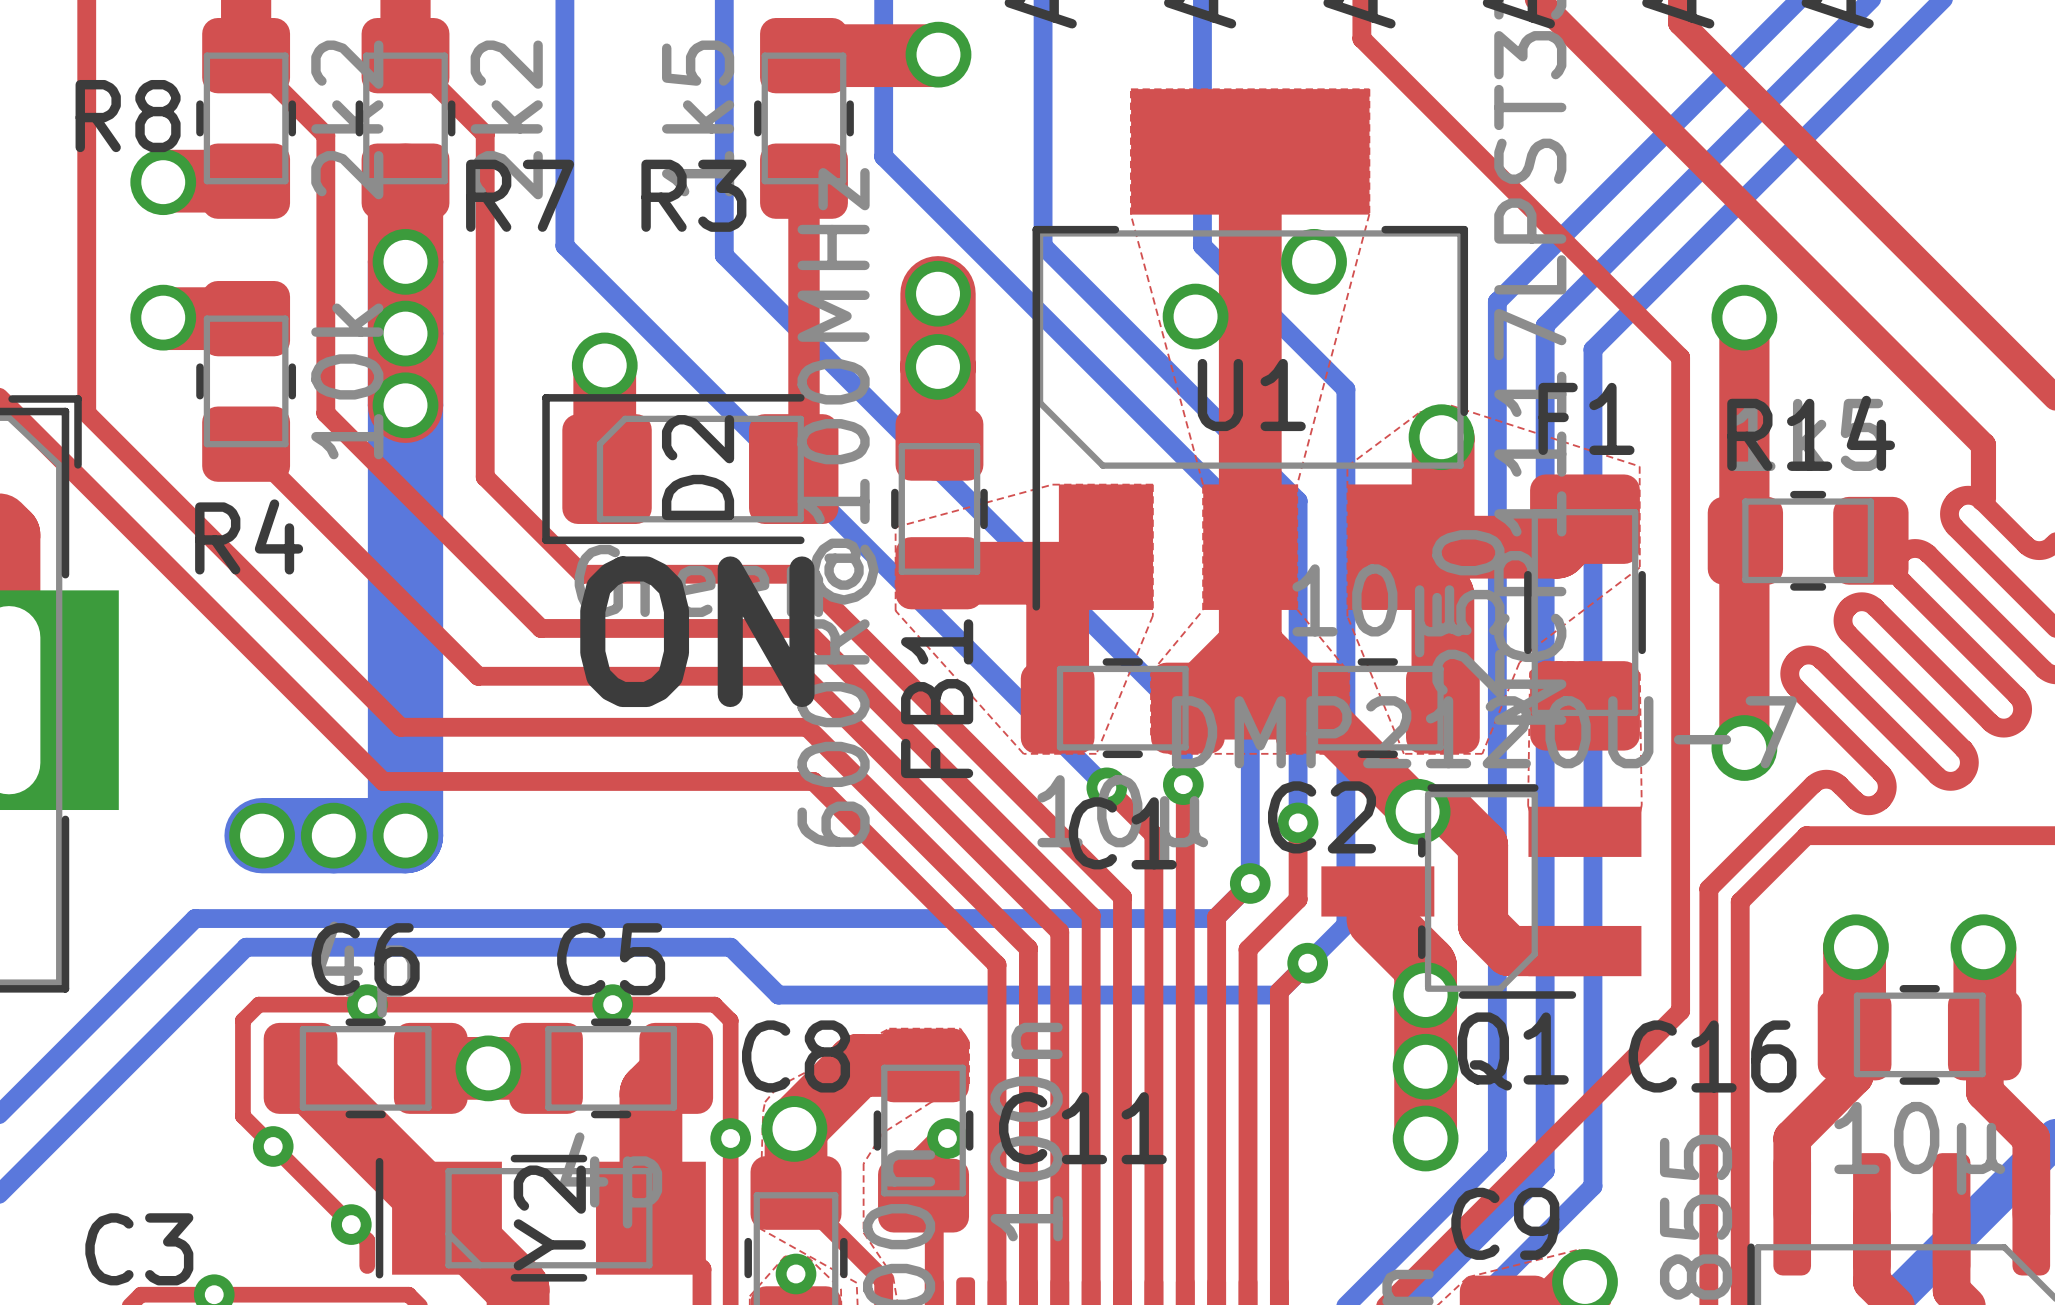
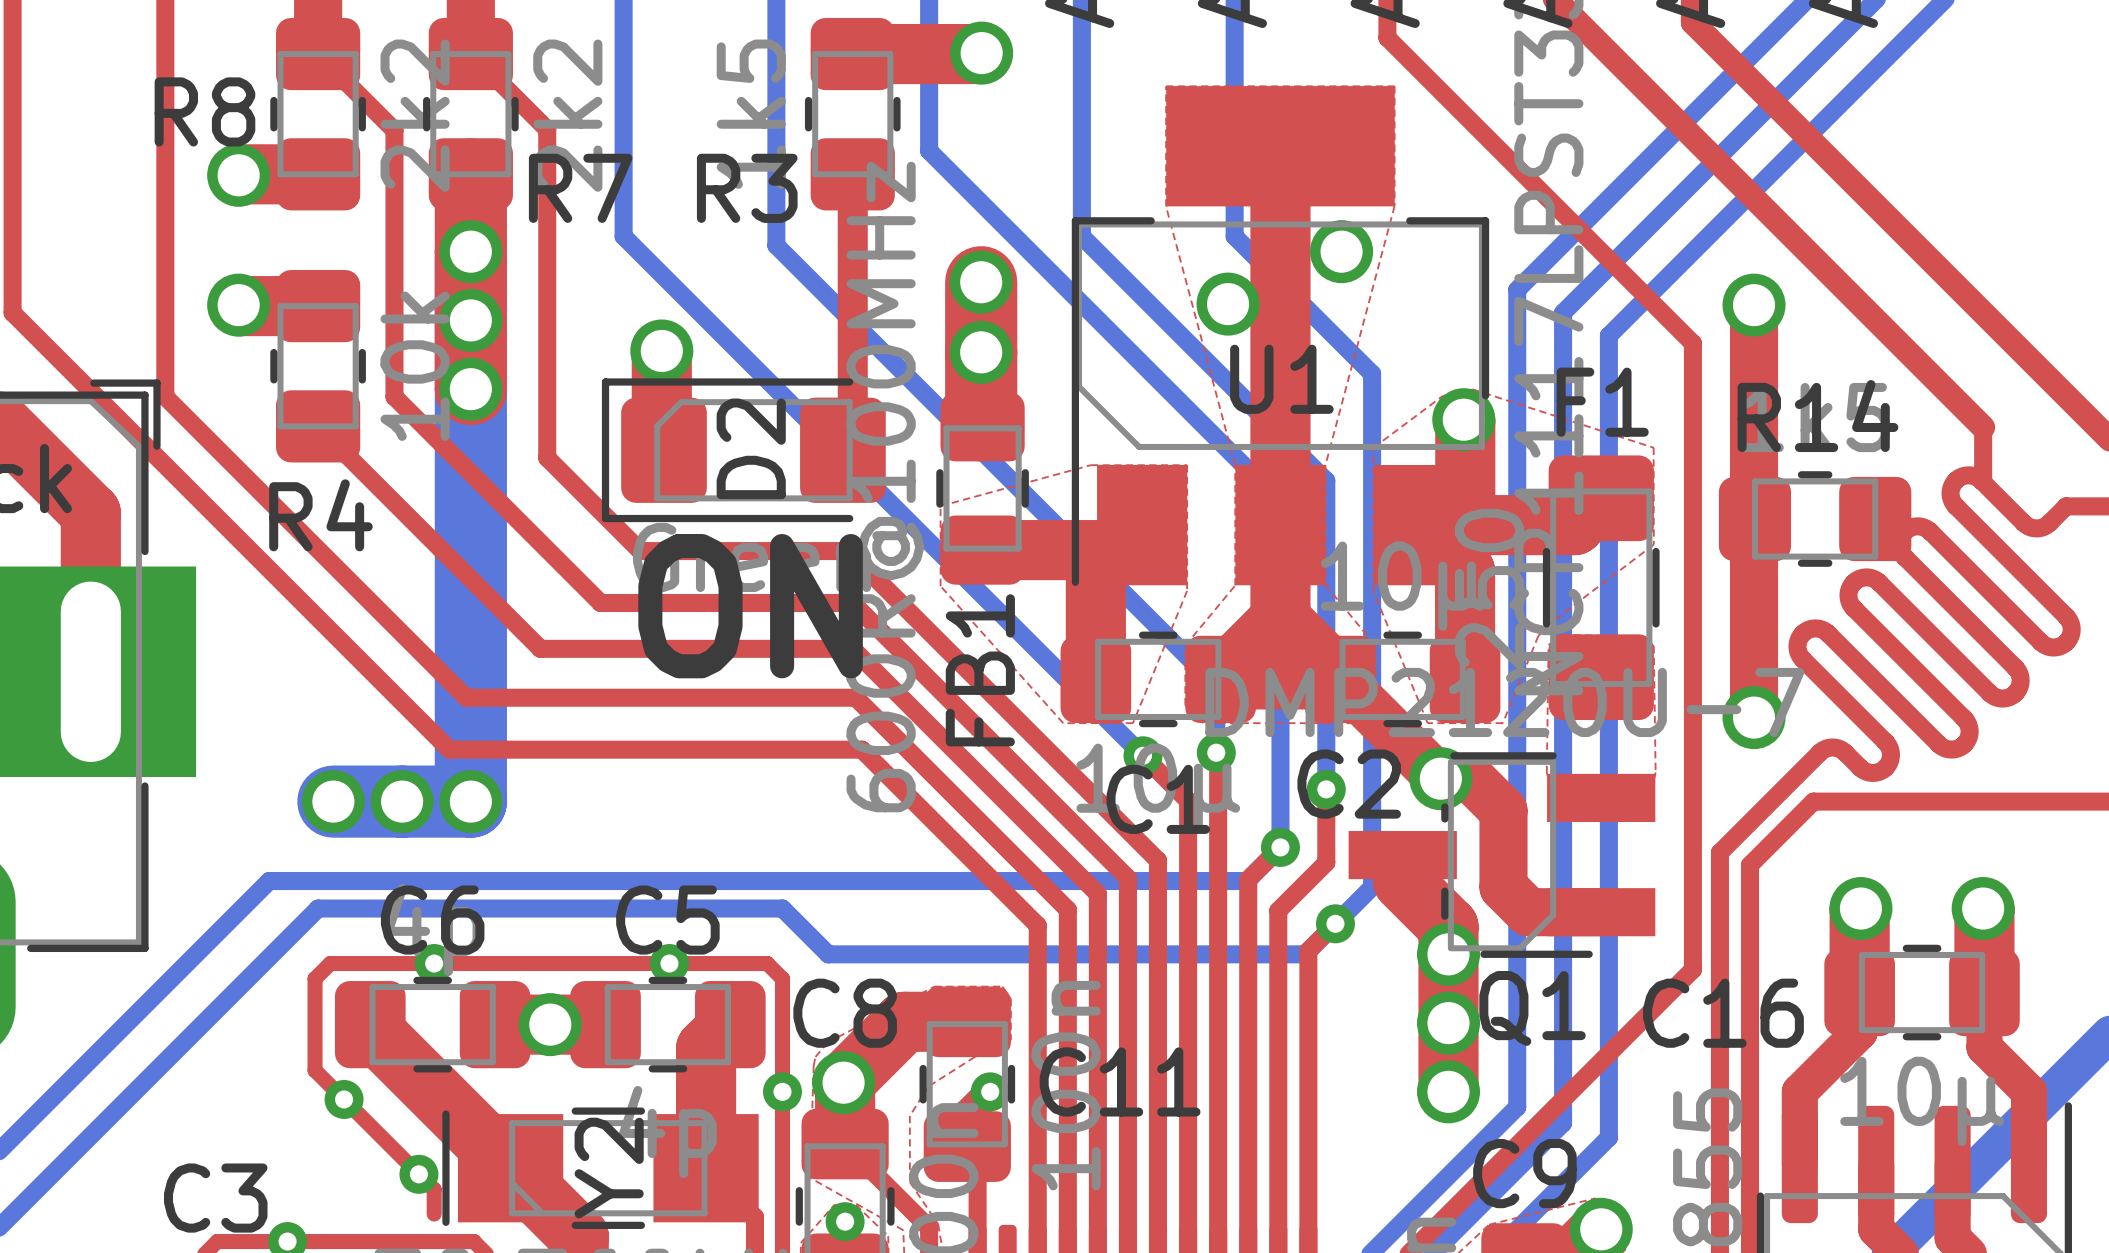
top track width: thick (1983, 445) (1983, 498) -> thin (1983, 427) (1983, 478)

